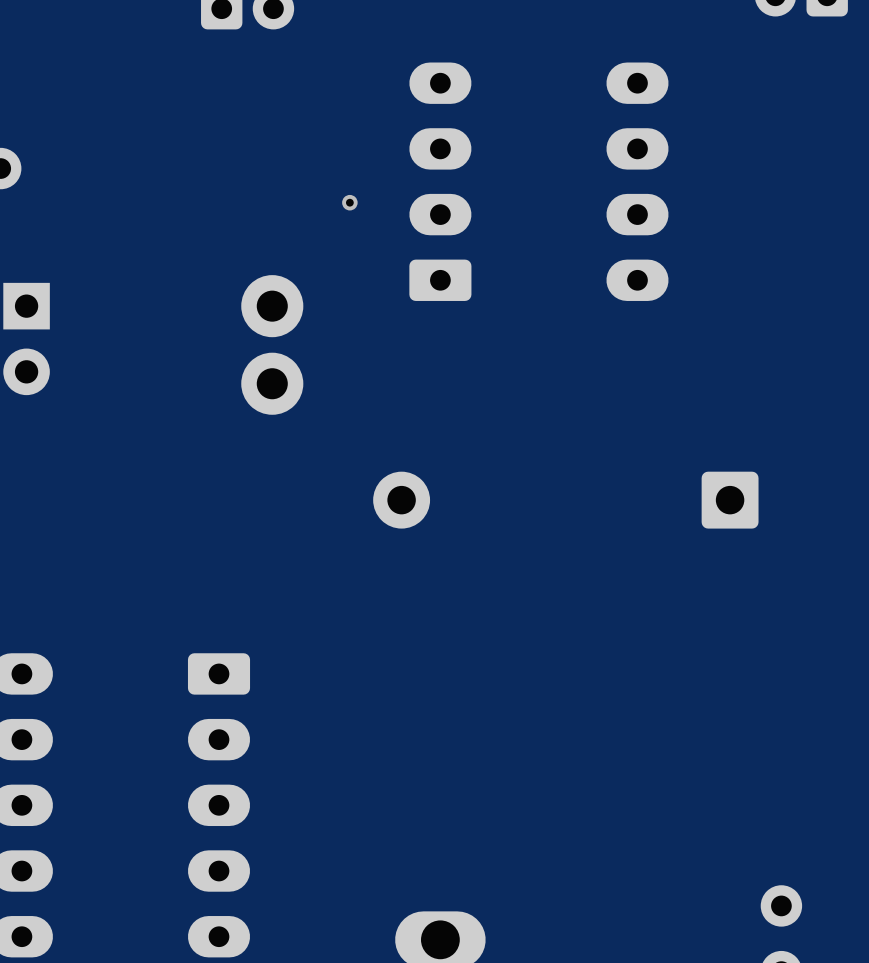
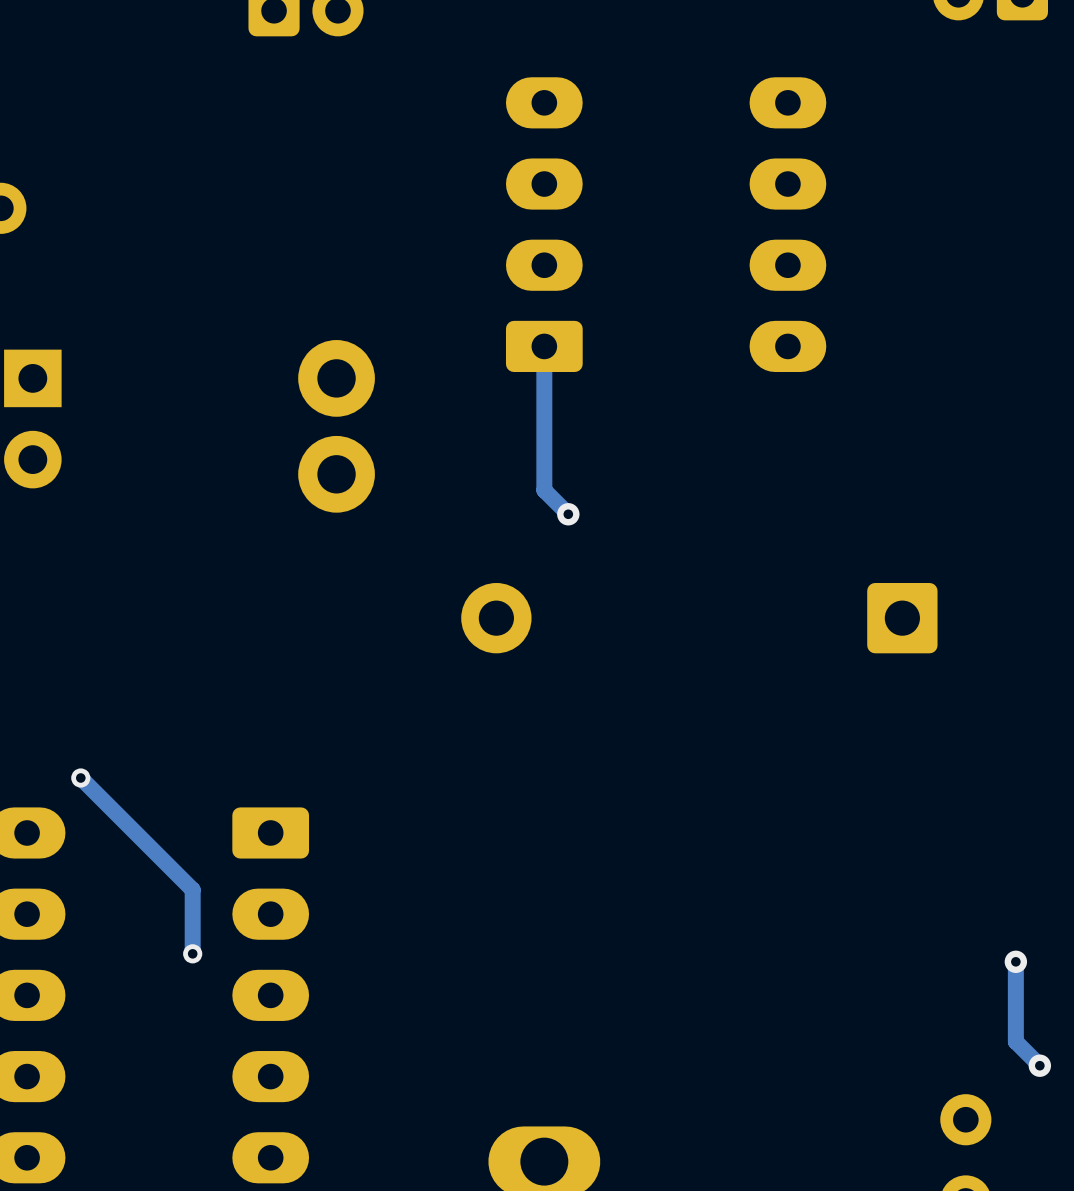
via: (349, 202) -> none
track: none -> (544, 346) (544, 490) (568, 514)
via: none -> (568, 514)
track: none -> (80, 778) (192, 889) (192, 953)
via: none -> (80, 778)
via: none -> (192, 953)
track: none -> (1015, 961) (1015, 1041) (1039, 1065)
via: none -> (1015, 961)
via: none -> (1039, 1065)

